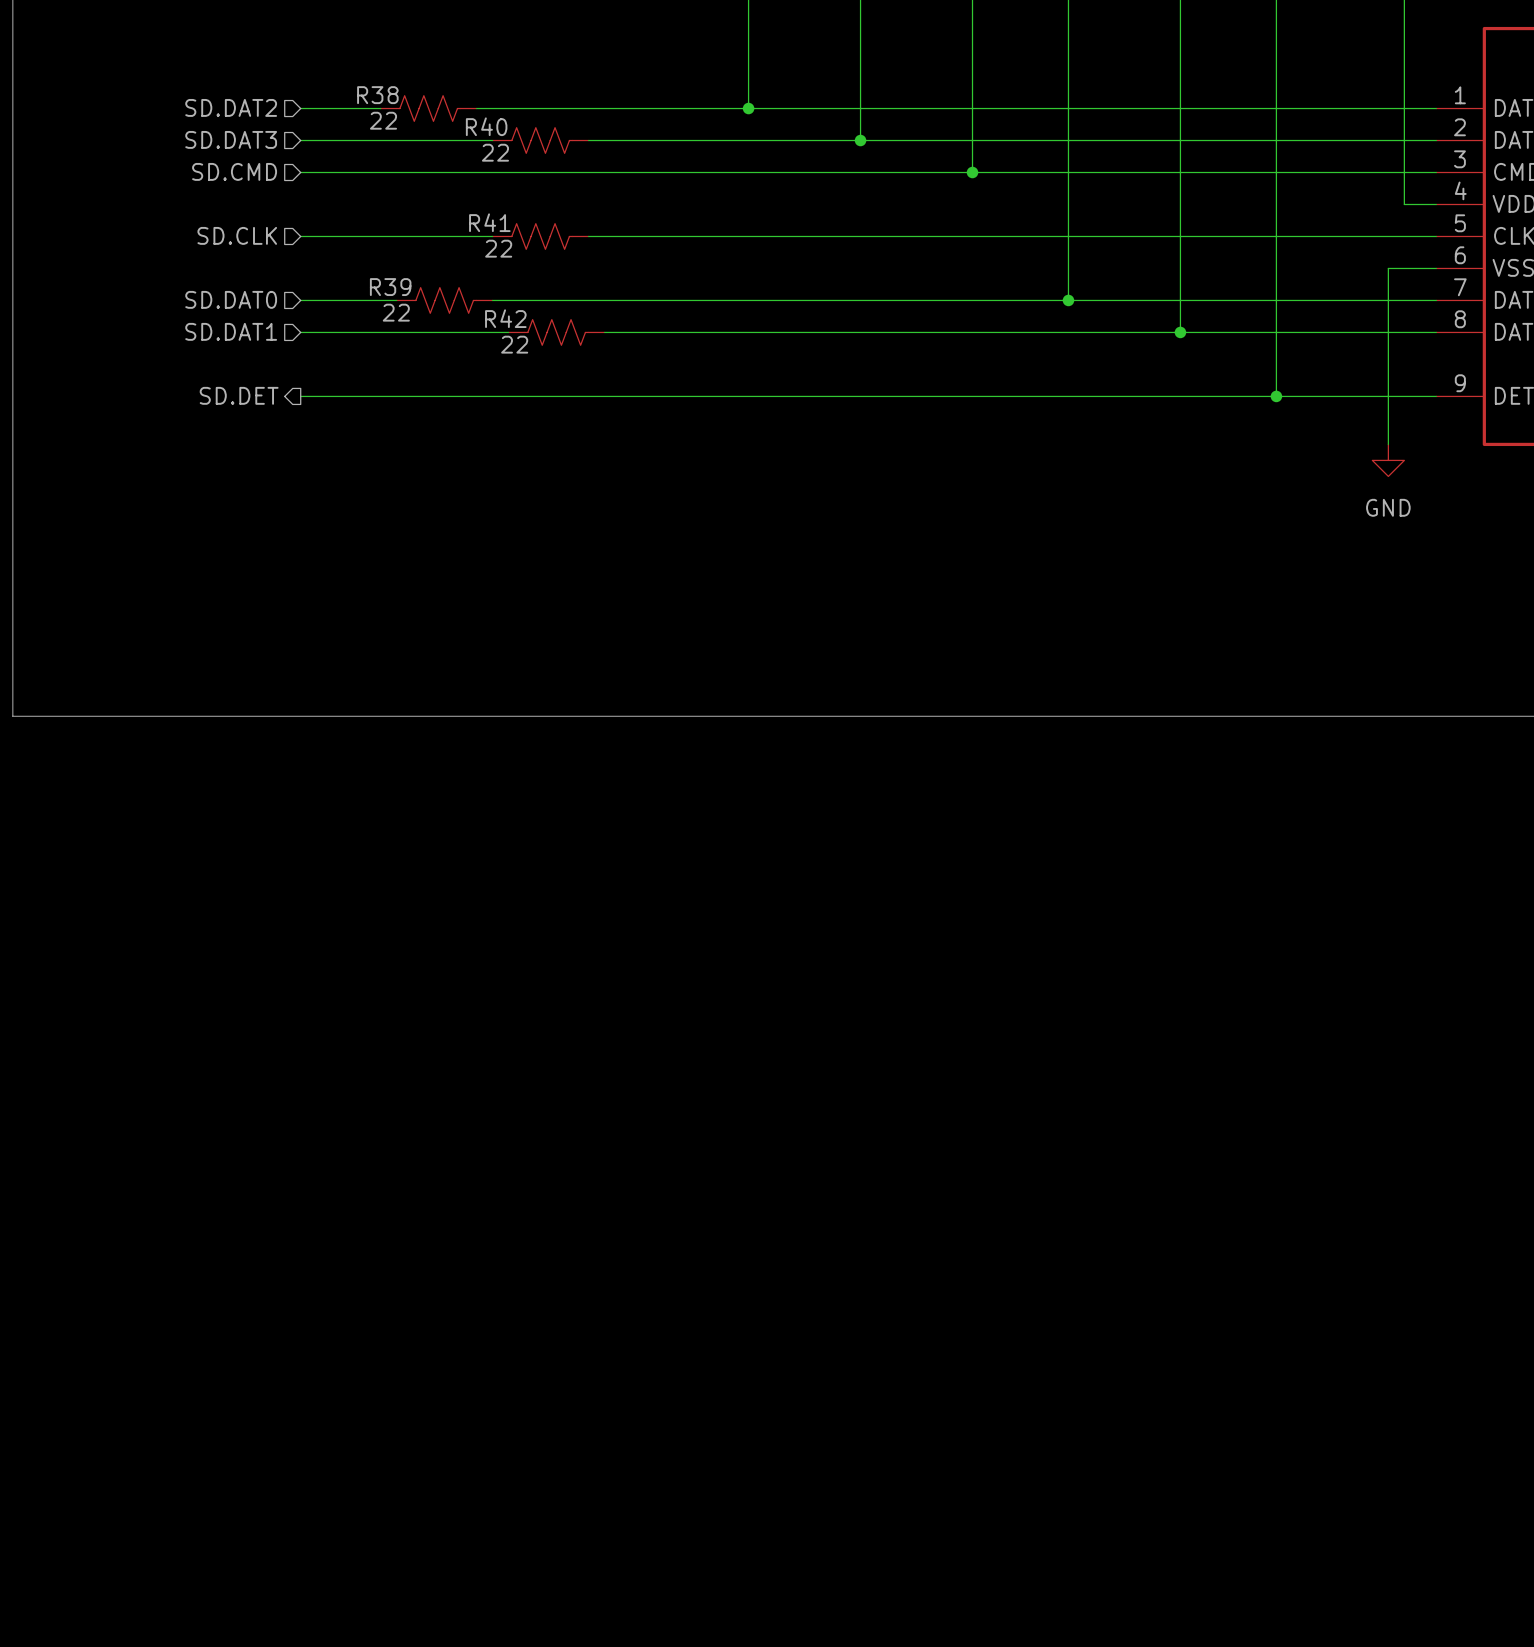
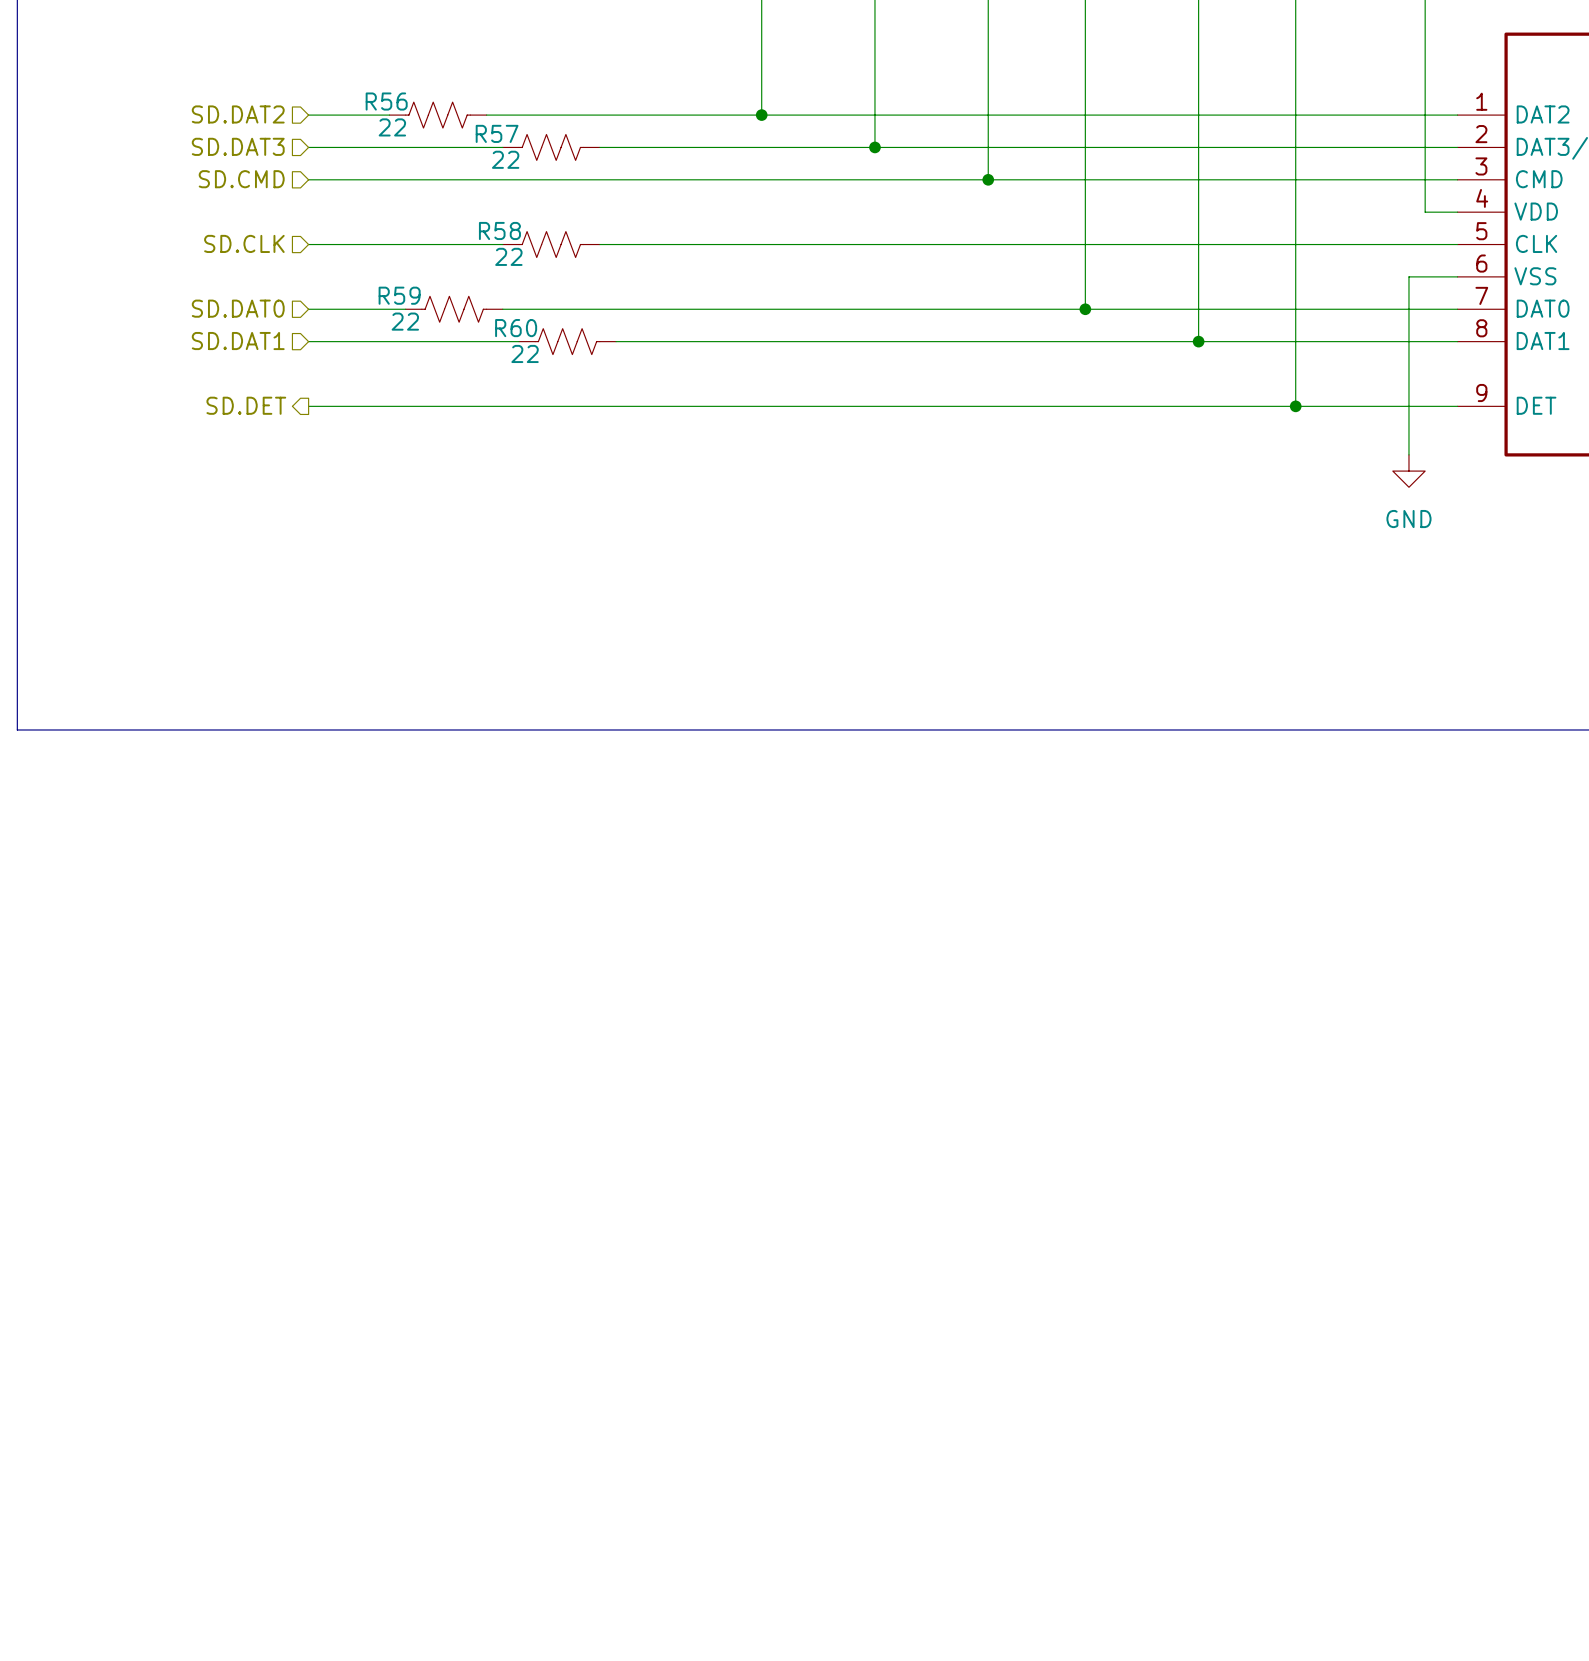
R38 name: R38 (377, 95) -> R56 (386, 101)
R40 name: R40 (486, 126) -> R57 (497, 133)
R41 name: R41 (489, 222) -> R58 (499, 230)
R39 name: R39 (390, 287) -> R59 (399, 295)
R42 name: R42 (505, 318) -> R60 (516, 328)

